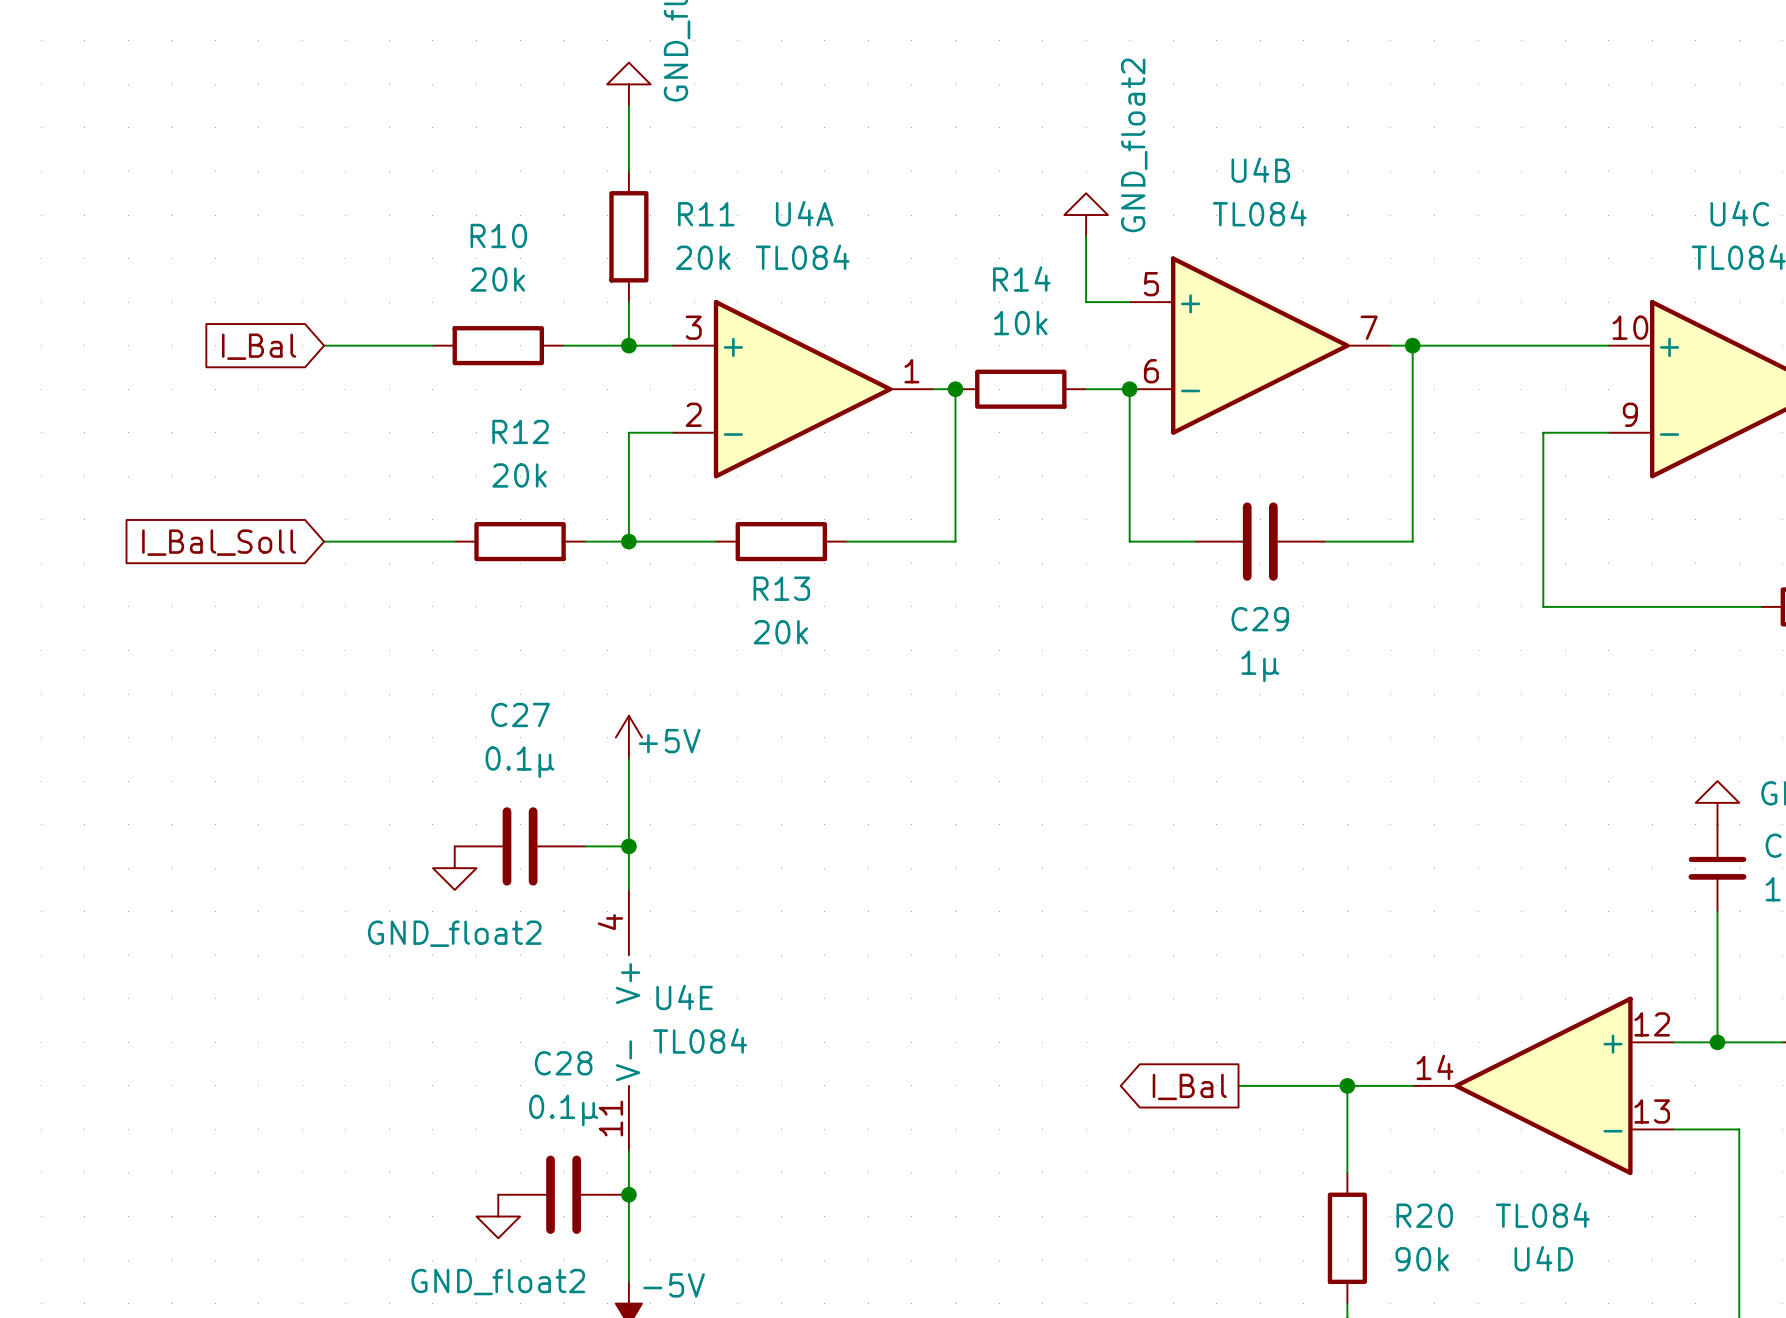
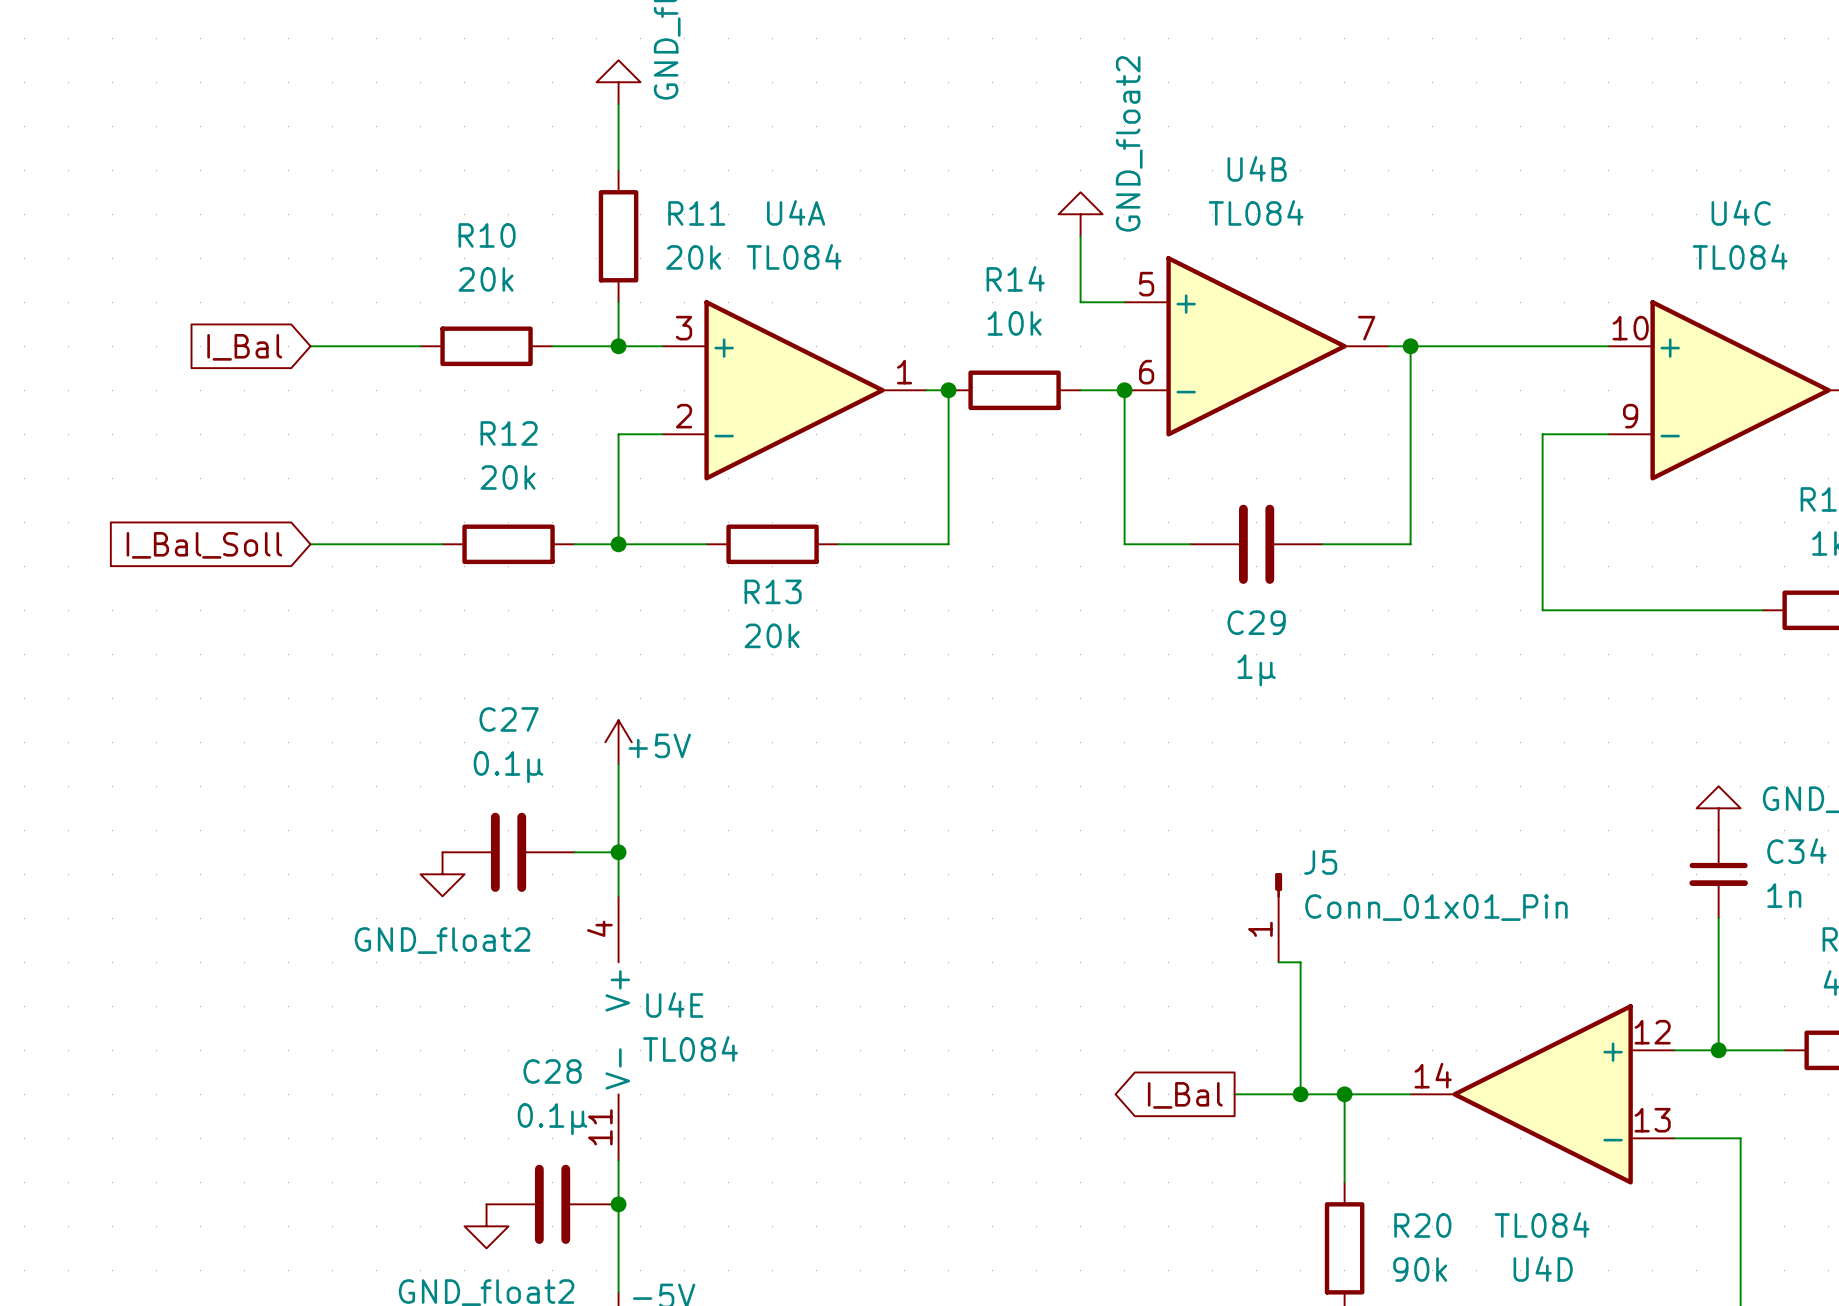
J5: none -> Conn_01x01_Pin (1278, 917)
wire: none -> (1278, 962) (1300, 962) (1300, 1094)
junction: none -> (1300, 1094)

